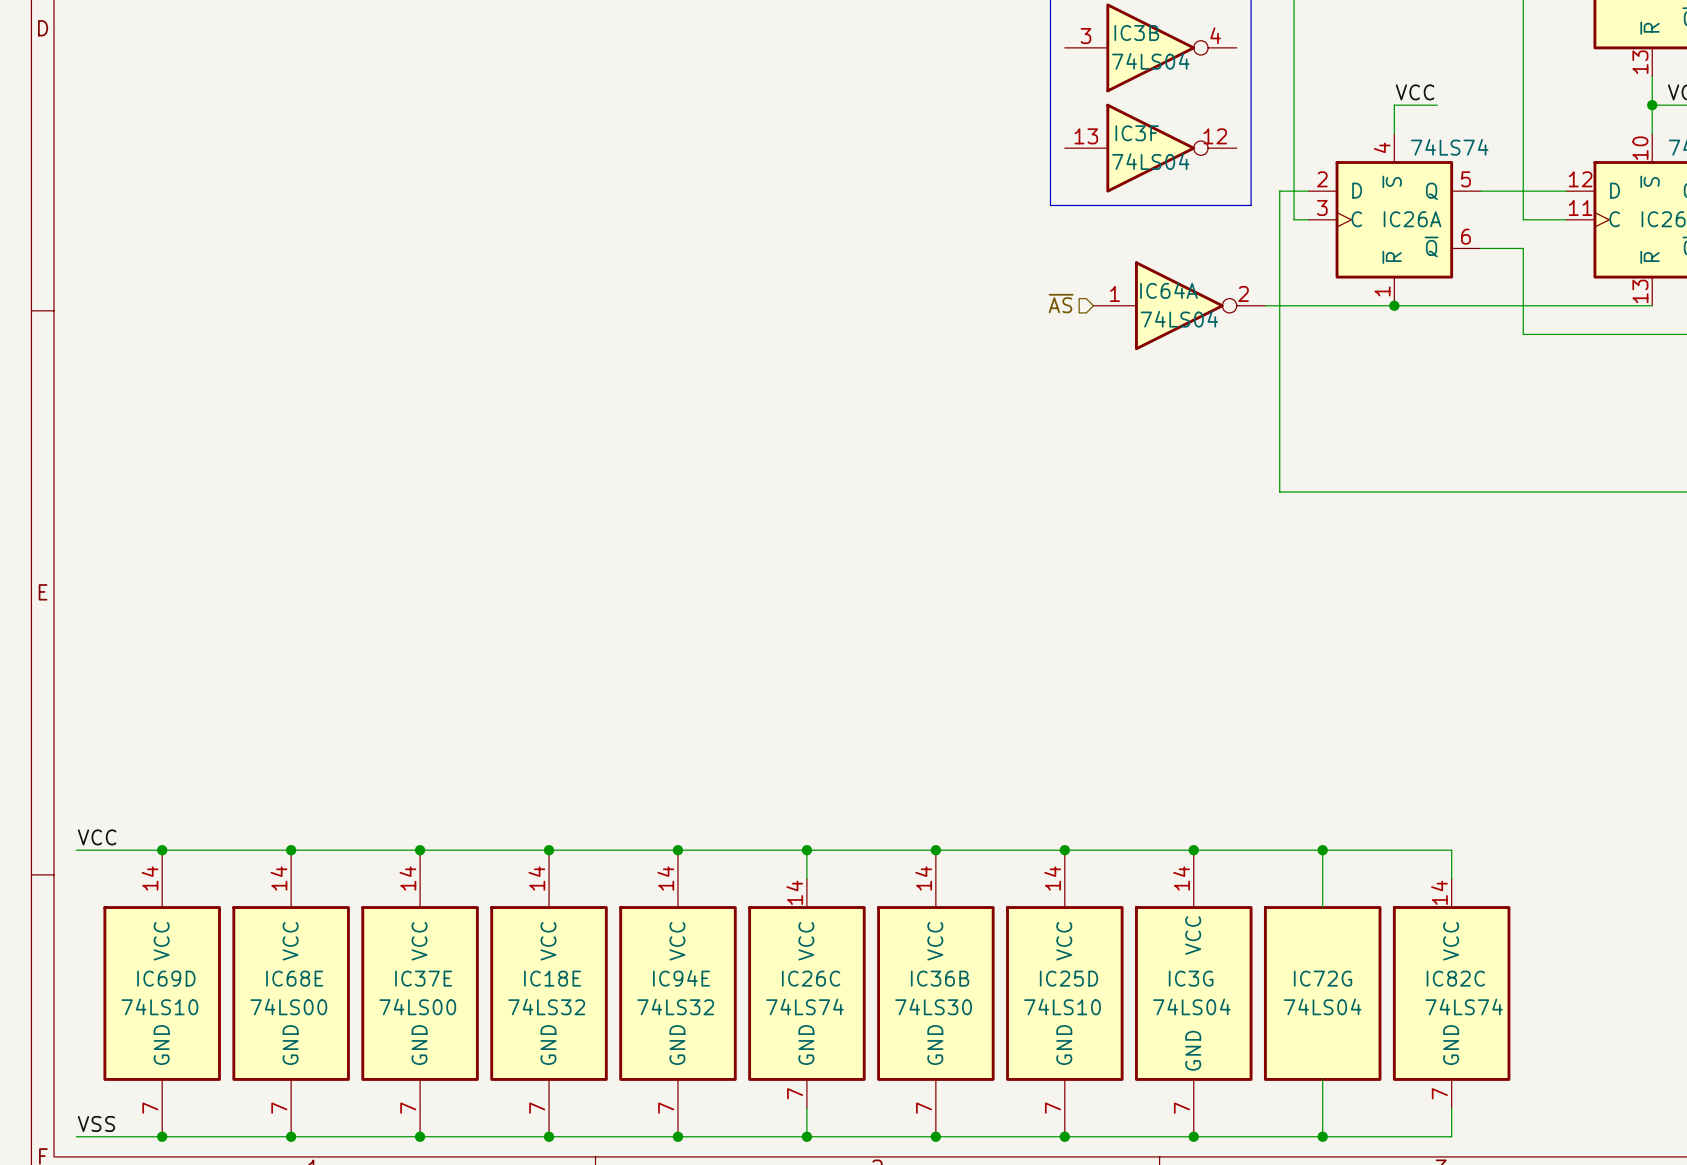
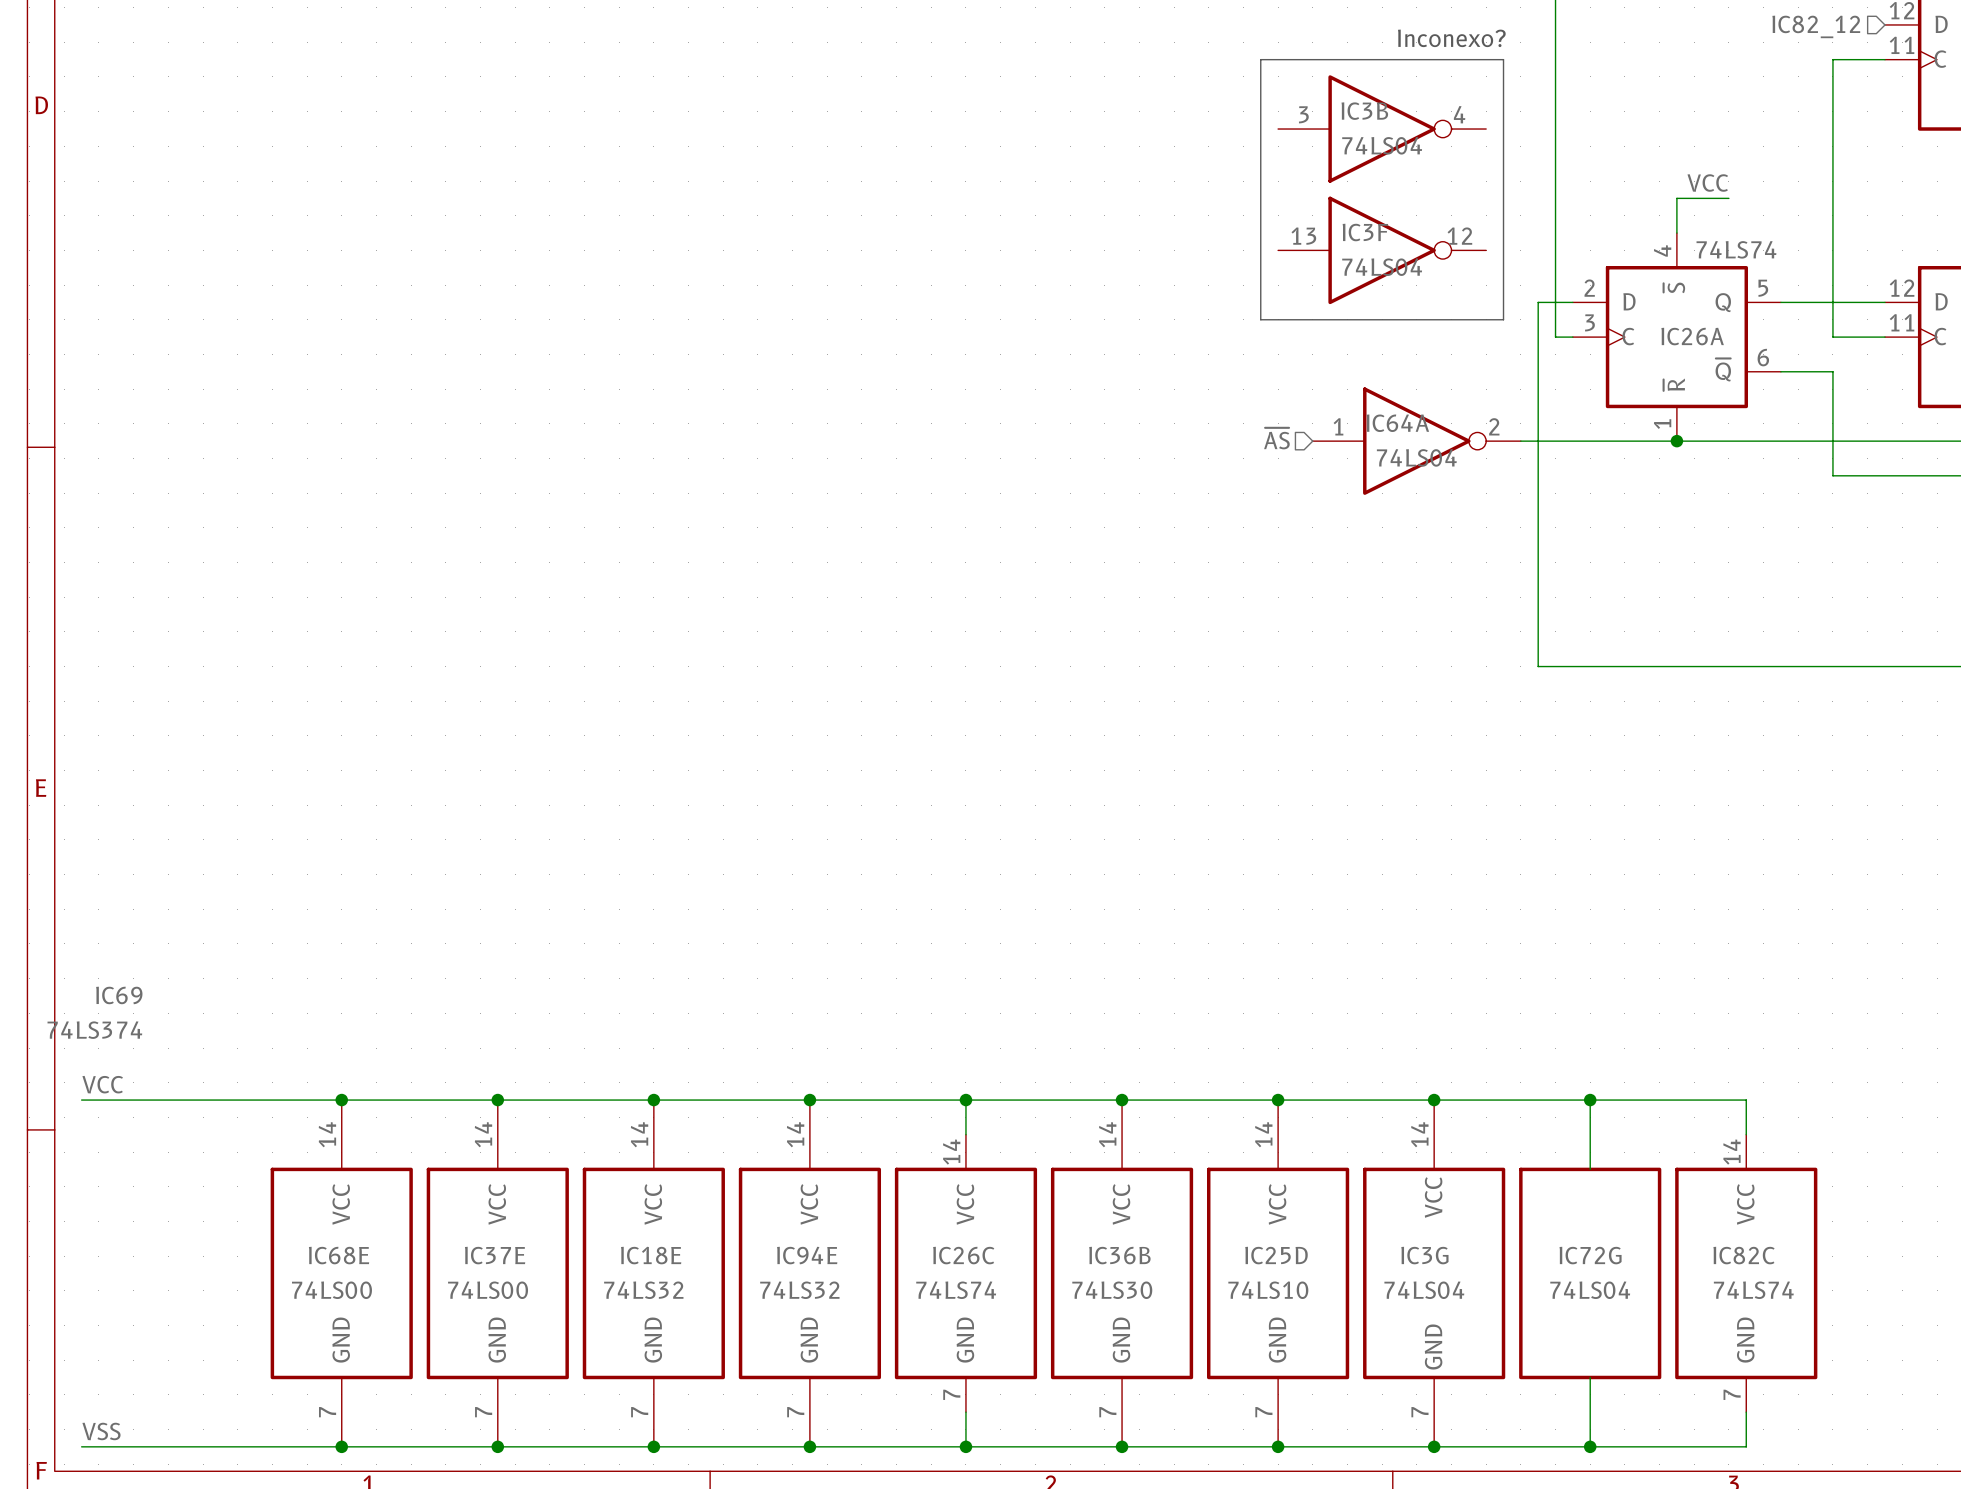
IC69: none -> 74LS374 (94, 1012)
junction: (162, 850) -> none
IC69D: 74LS10 (162, 993) -> none
junction: (162, 1136) -> none

